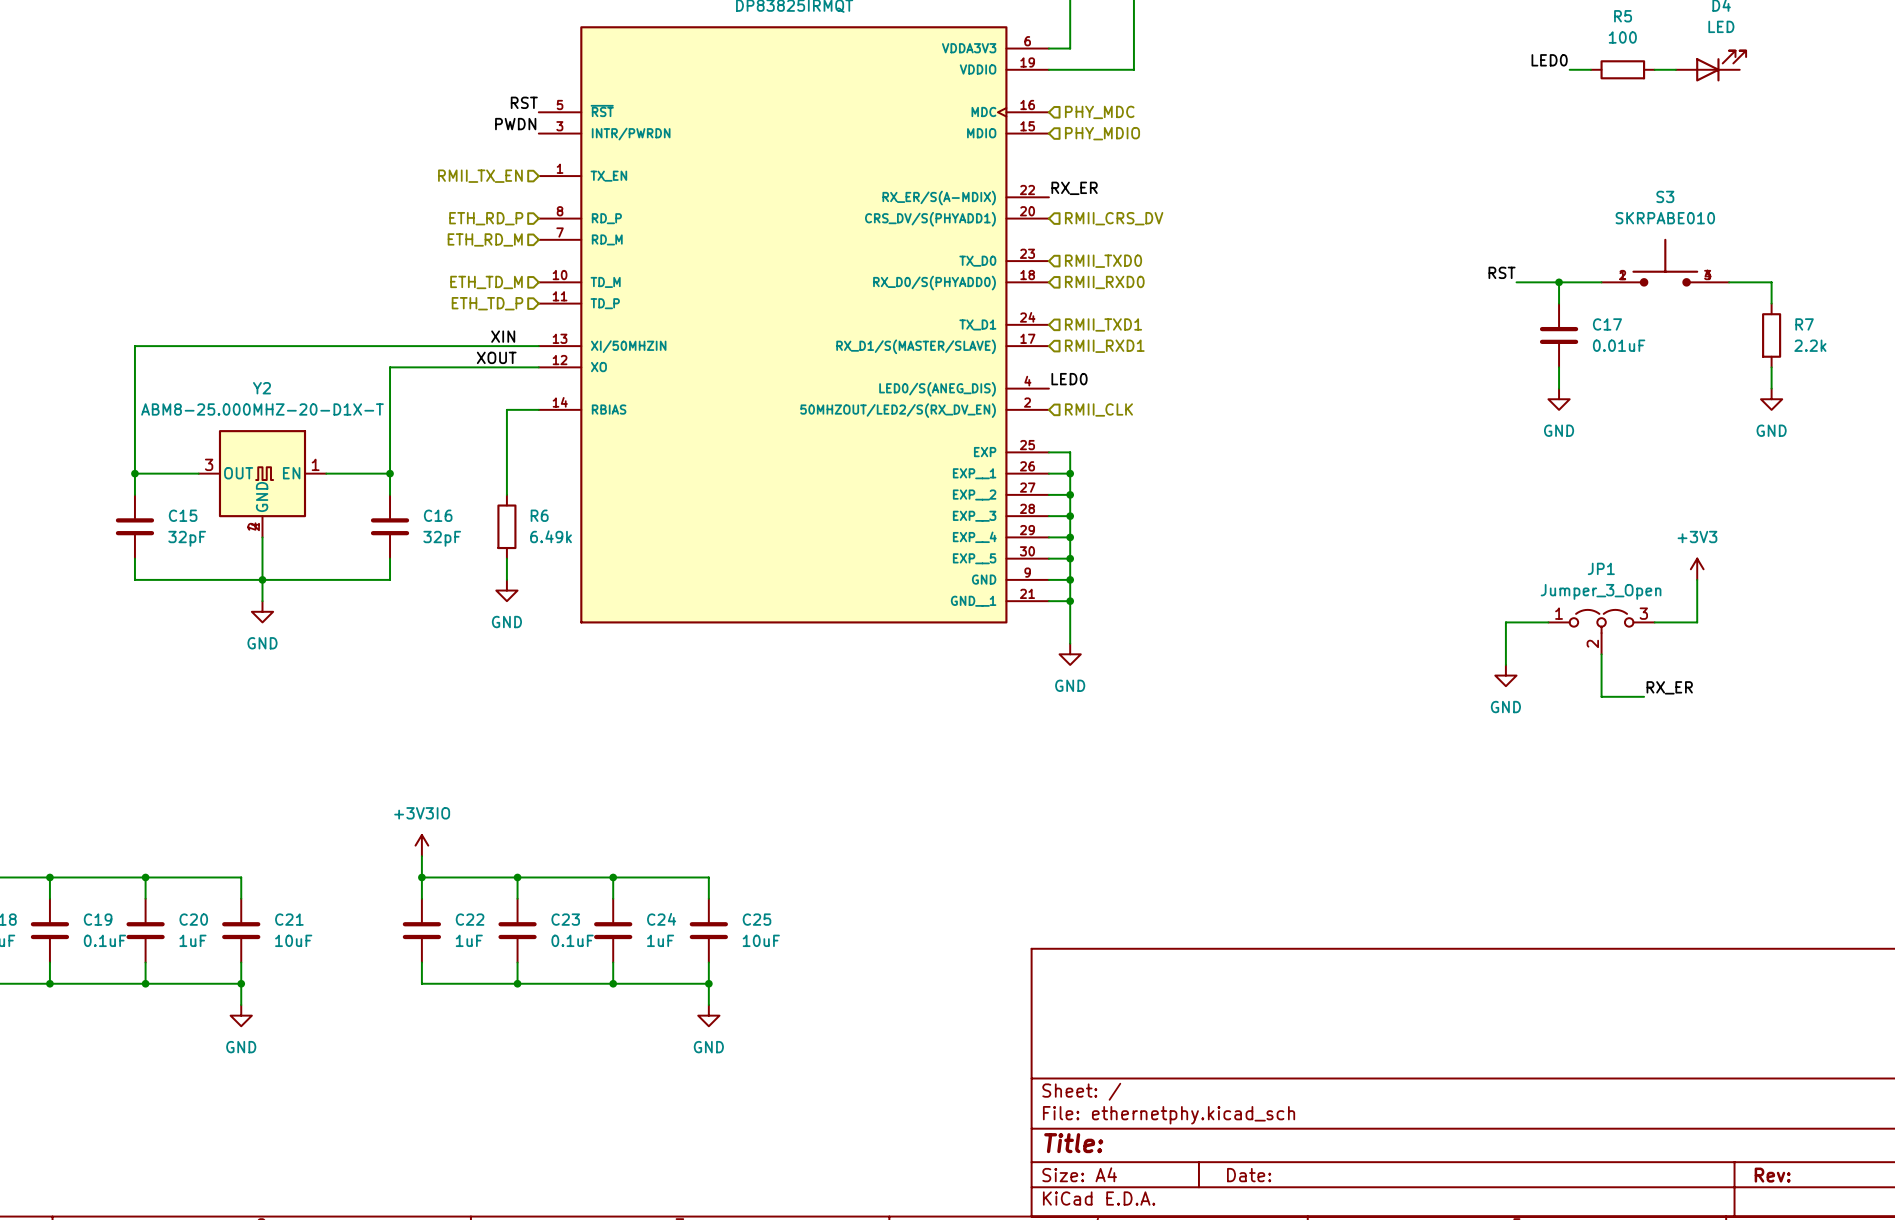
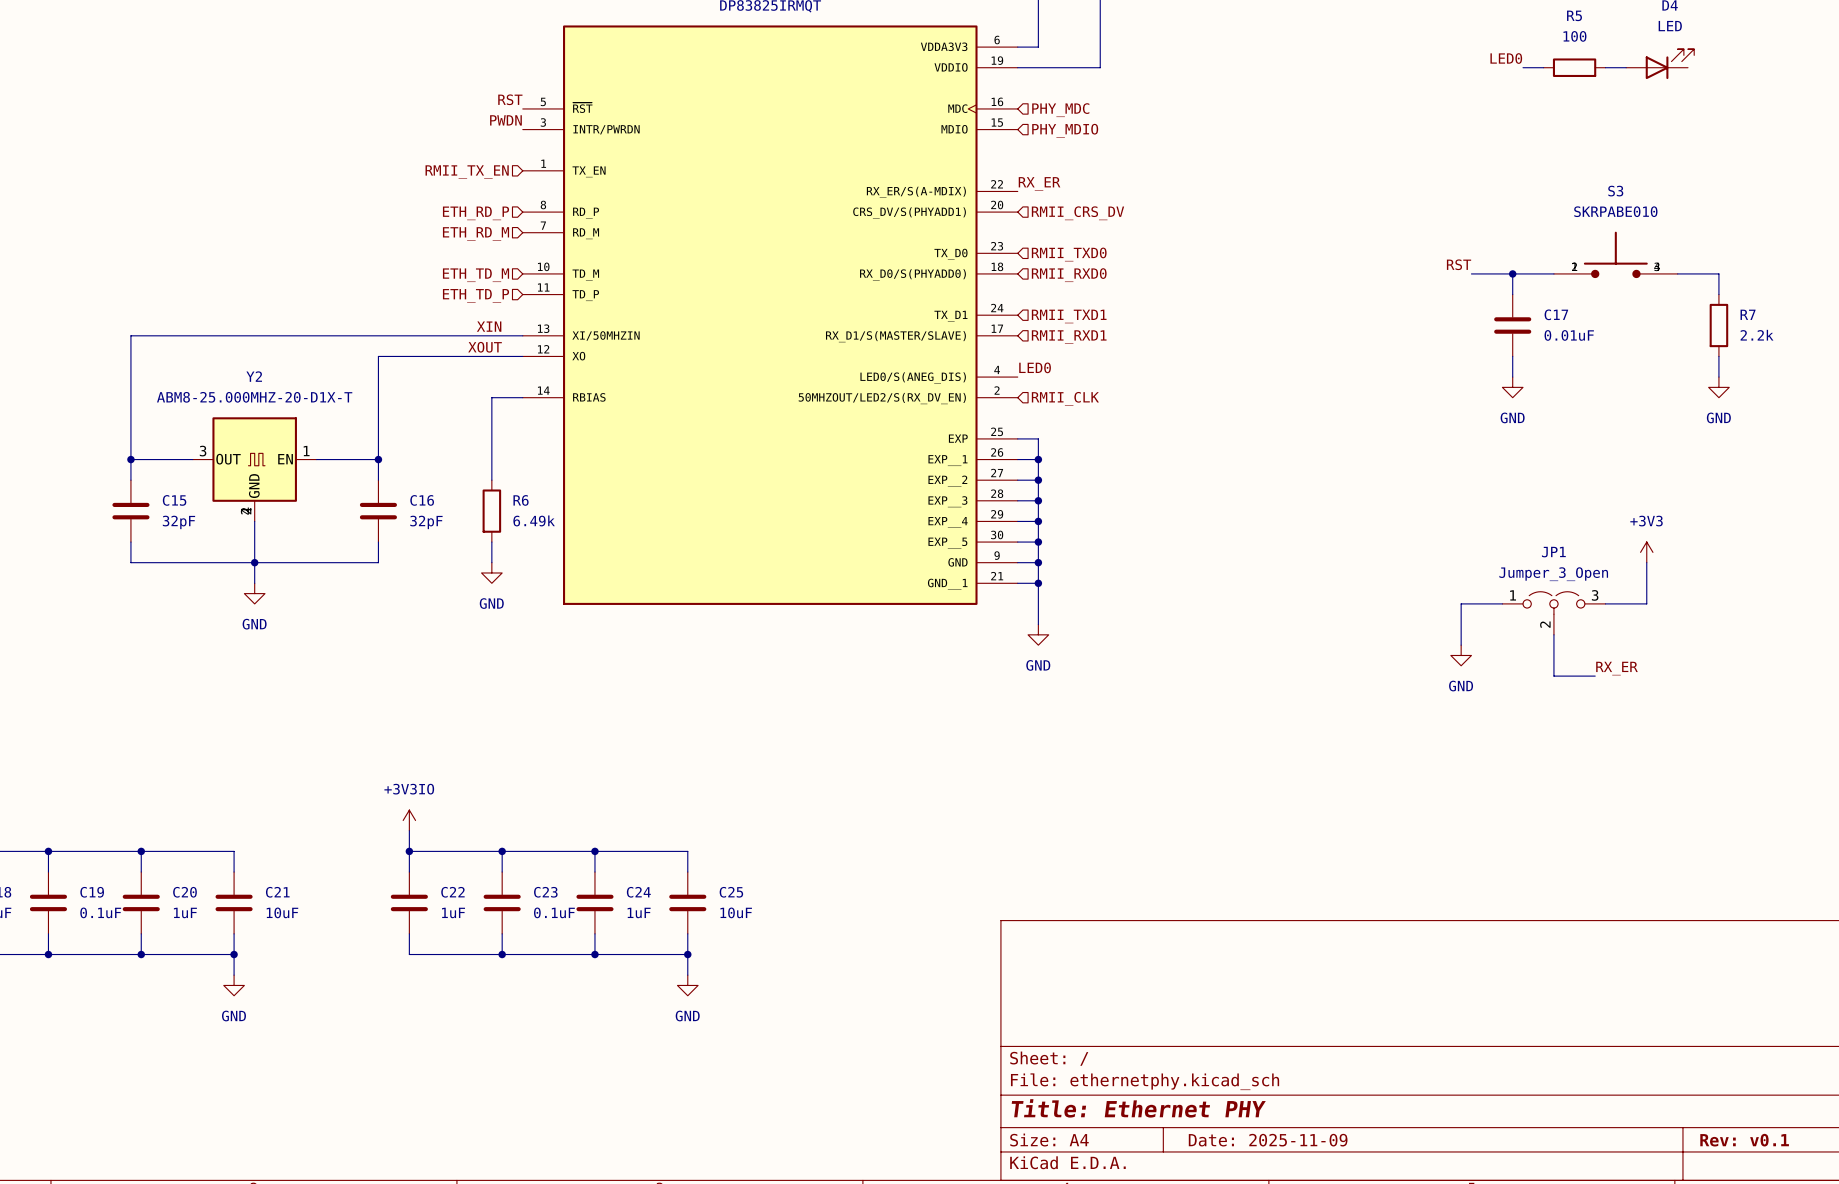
title block: Title: (1073, 1143) -> Title: Ethernet PHY (1138, 1108)
title block: Date: (1249, 1175) -> Date: 2025-11-09 (1268, 1140)
title block: Rev: (1772, 1175) -> Rev: v0.1 (1744, 1140)

